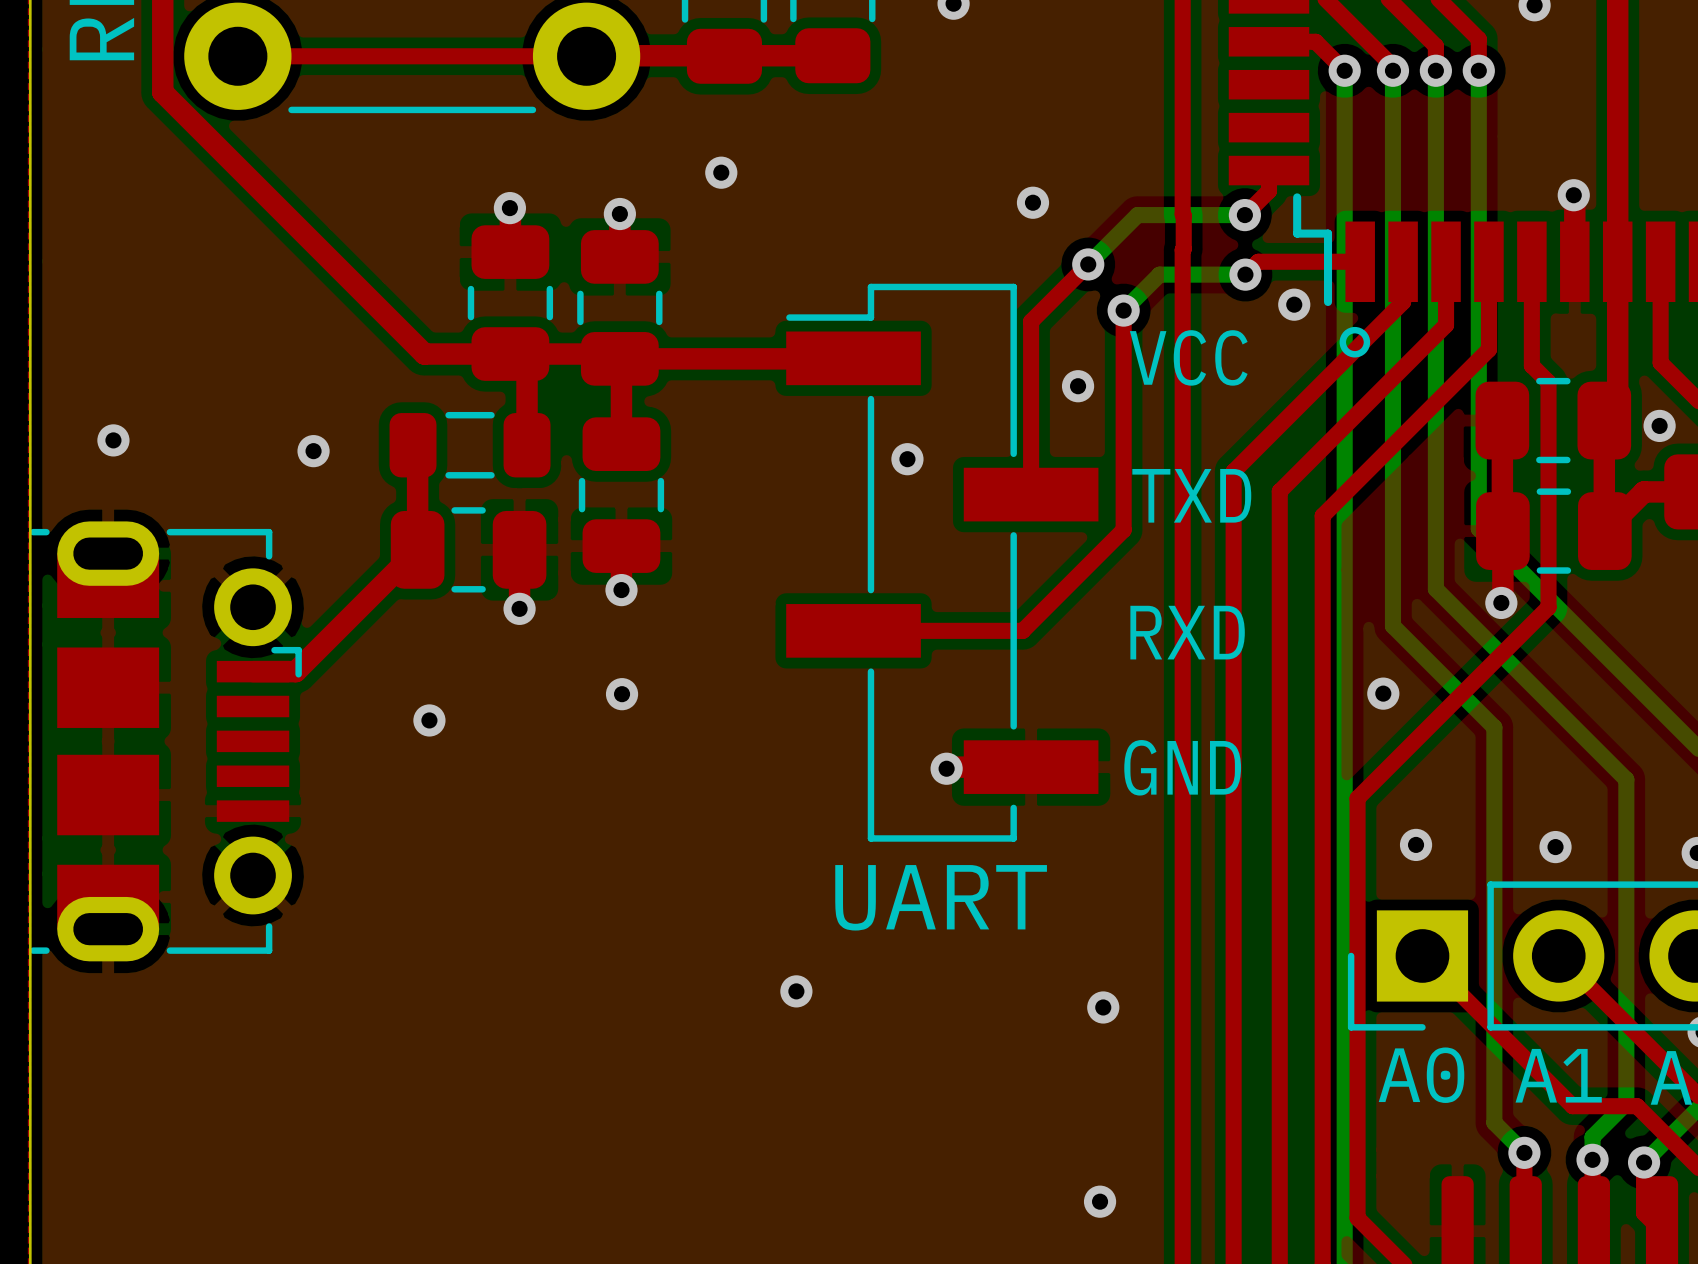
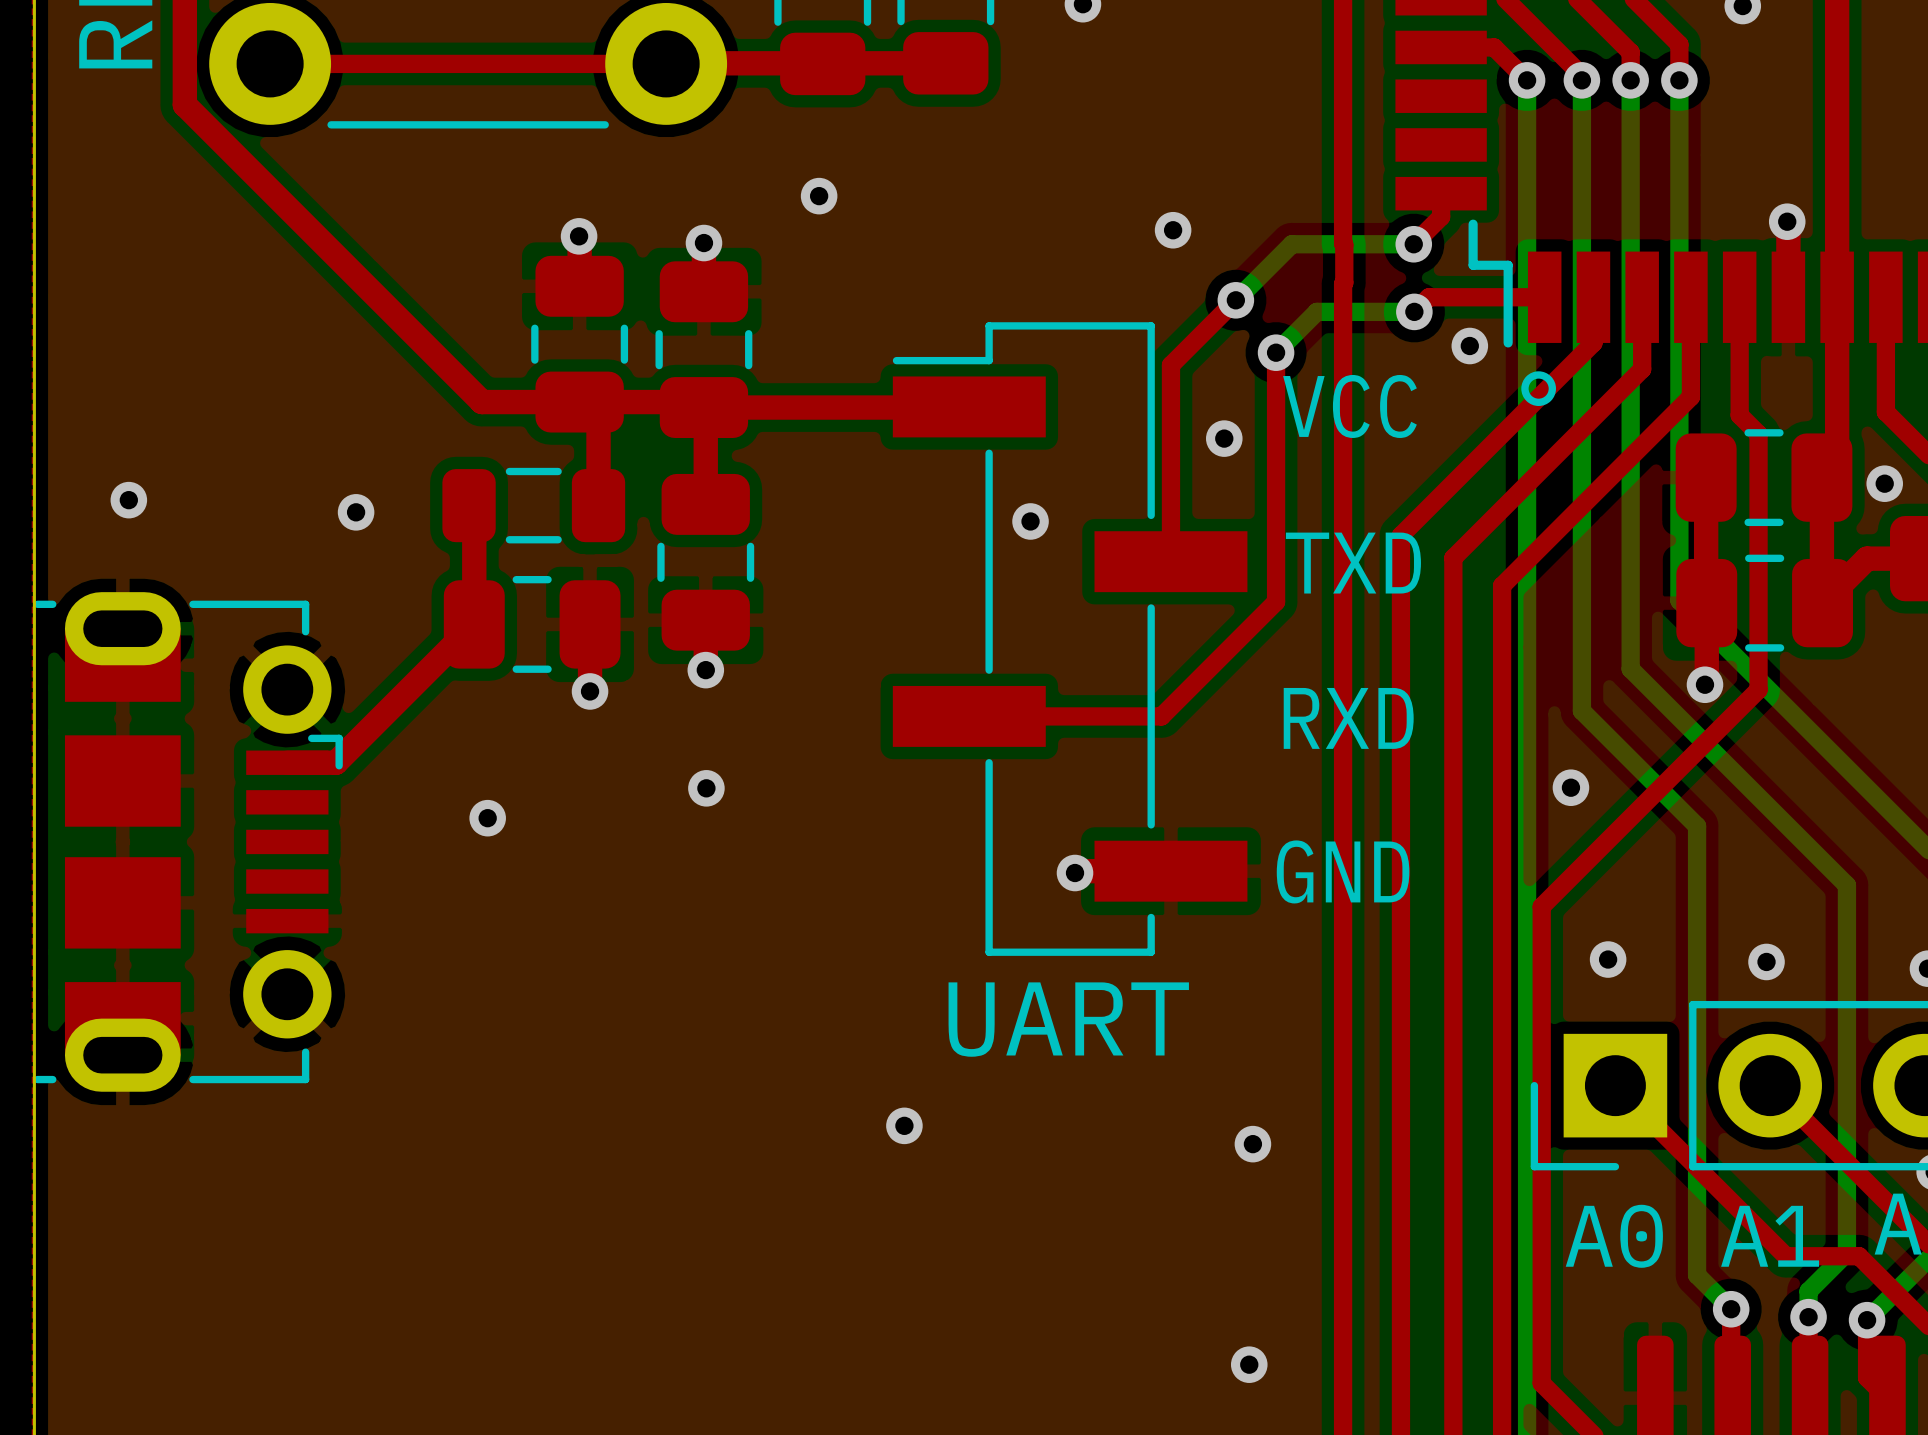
text position: A0 (1421, 1075) -> A0 (1614, 1236)
text position: A1 (1558, 1075) -> A1 (1770, 1236)

